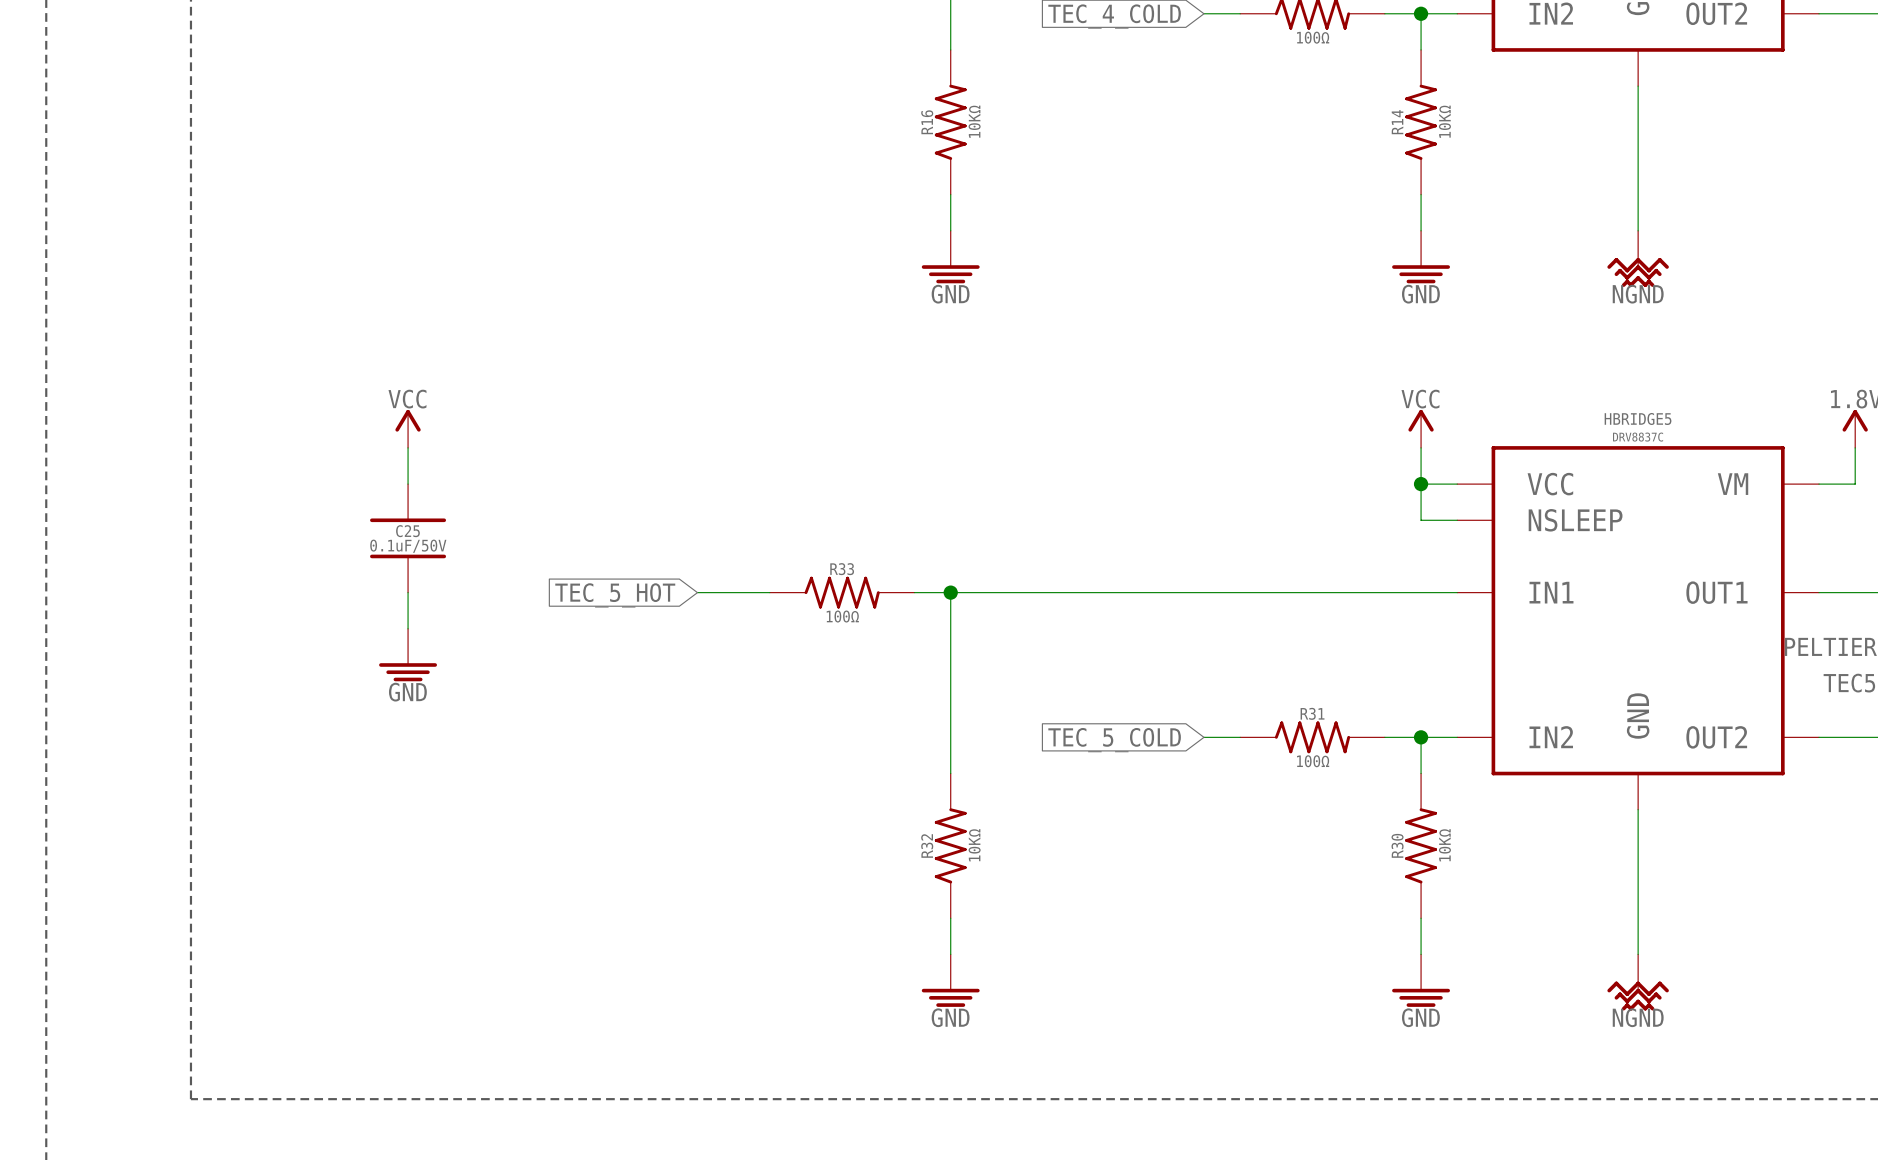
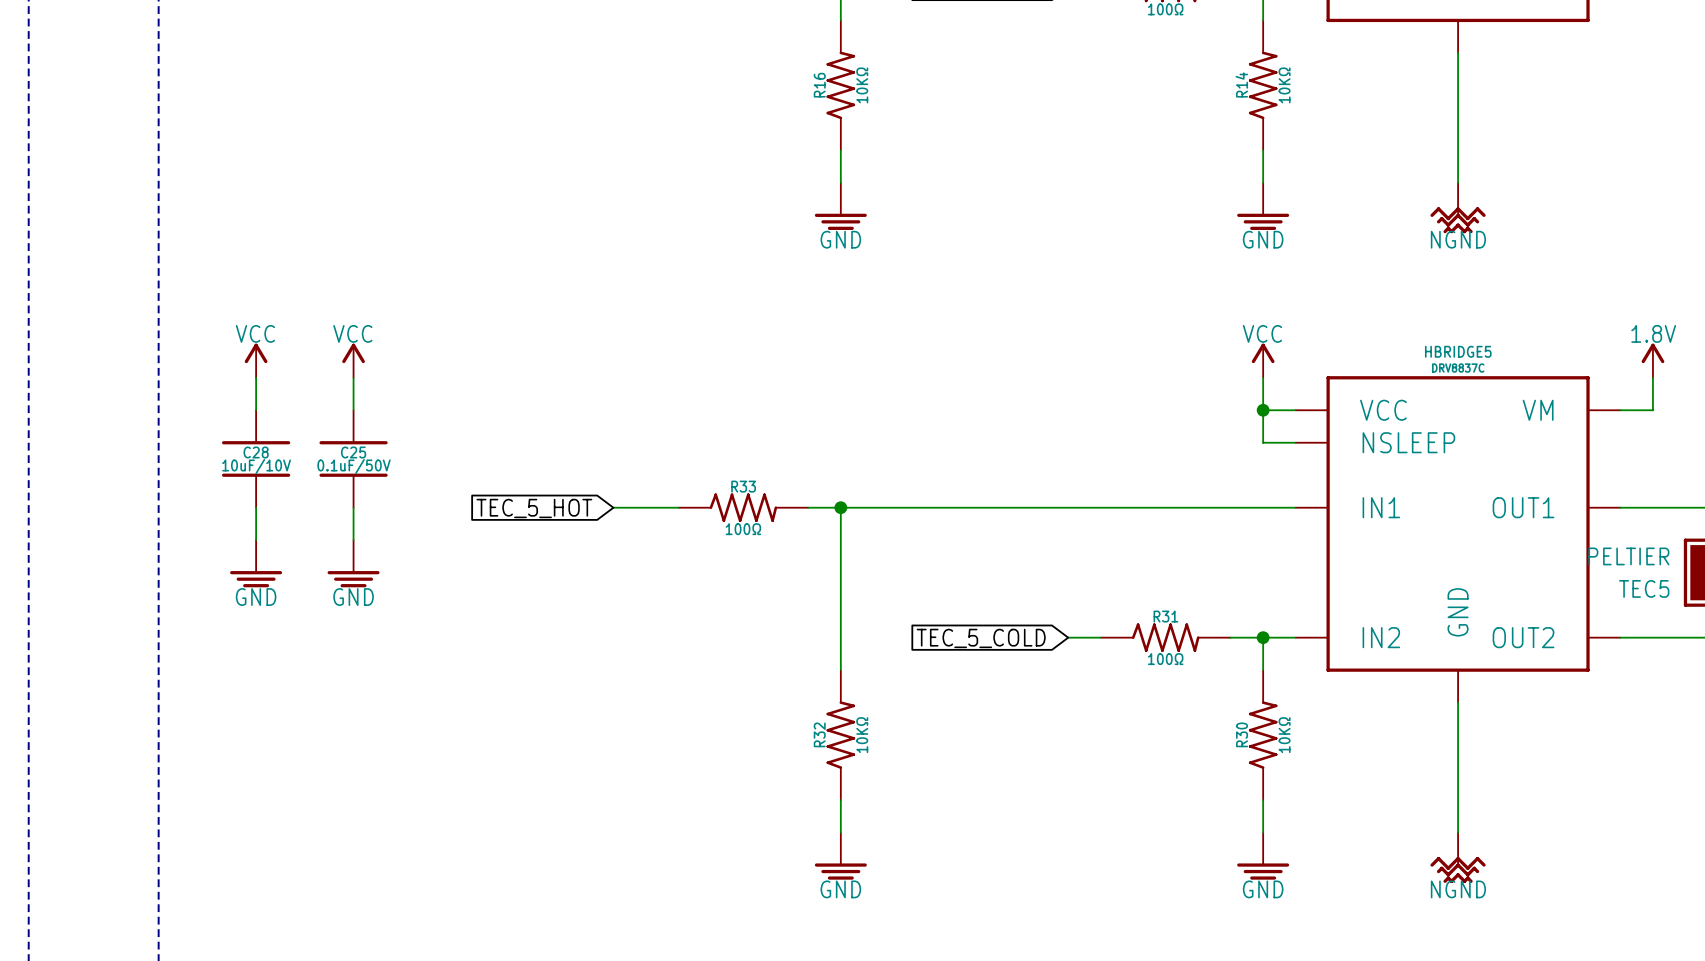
power symbol: none -> (256, 360)
wire: none -> (256, 377) (256, 410)
C28: none -> 10uF/10V (256, 458)
wire: none -> (256, 507) (256, 540)
power symbol: none -> (256, 563)

